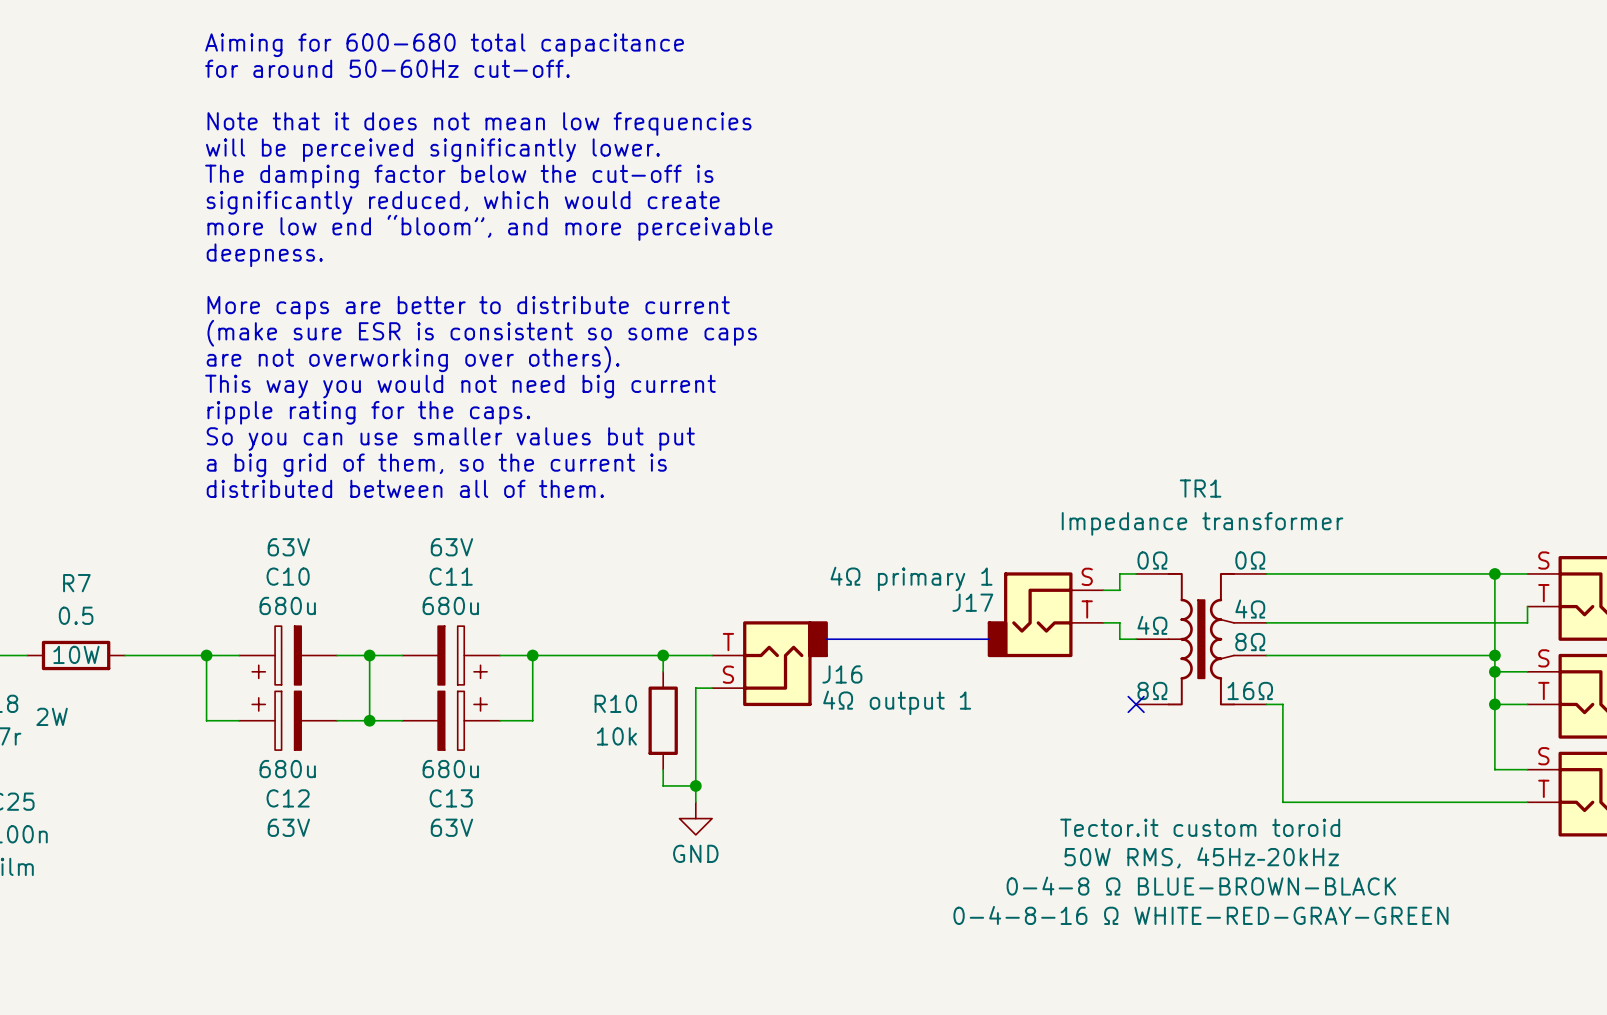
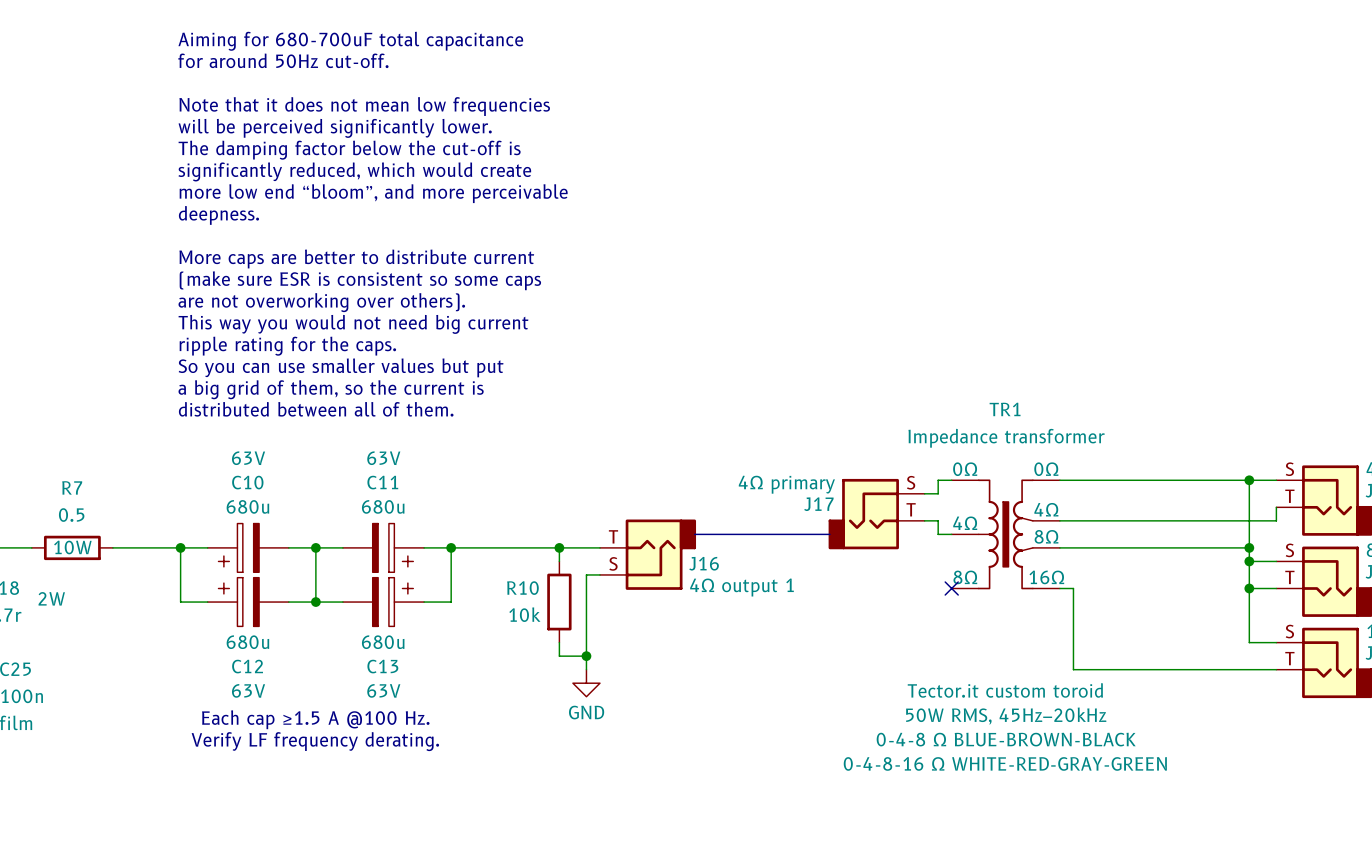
text: Aiming for 600-680 total capacitance (444, 45) -> Aiming for 680-700uF total capacitance (350, 41)
text: for around 50-60Hz cut-off. (387, 68) -> for around 50Hz cut-off. (283, 60)
J17 value: 4Ω primary 1 (911, 578) -> 4Ω primary (786, 484)
text: none -> Each cap ≥1.5 A @100 Hz. (315, 719)
text: none -> Verify LF frequency derating. (315, 741)

